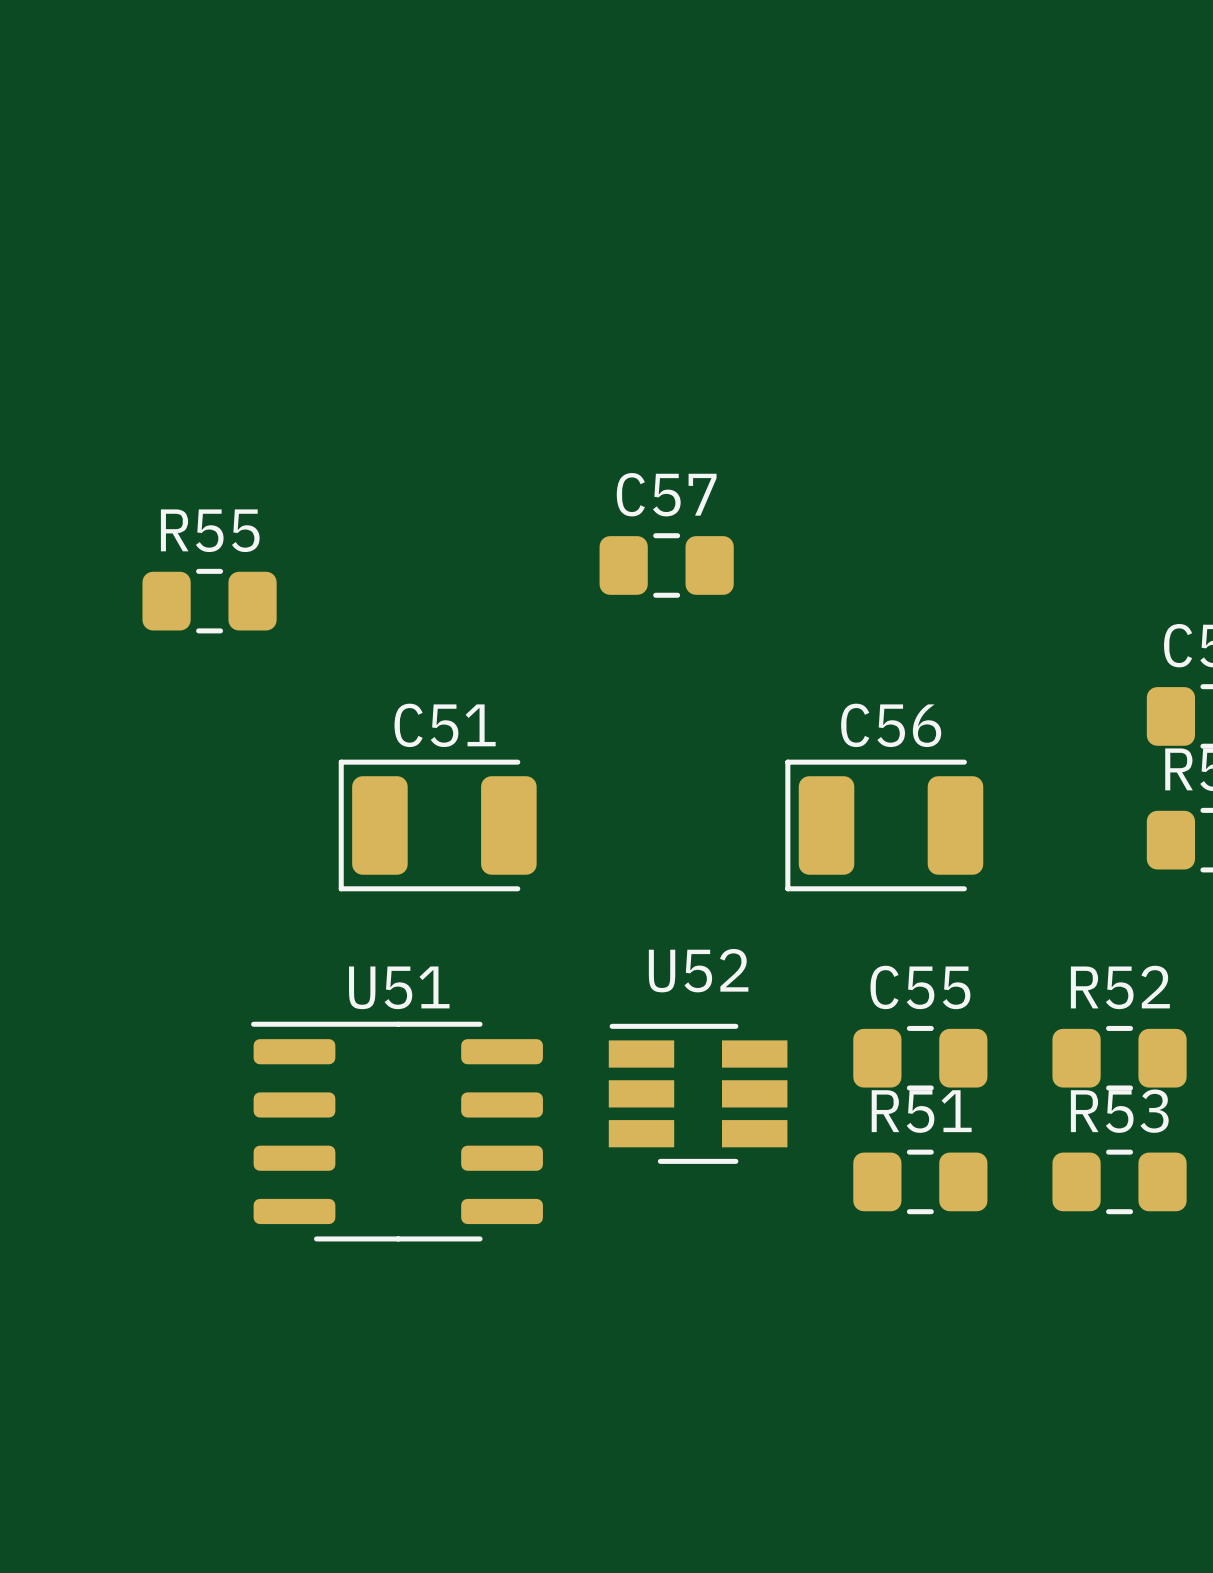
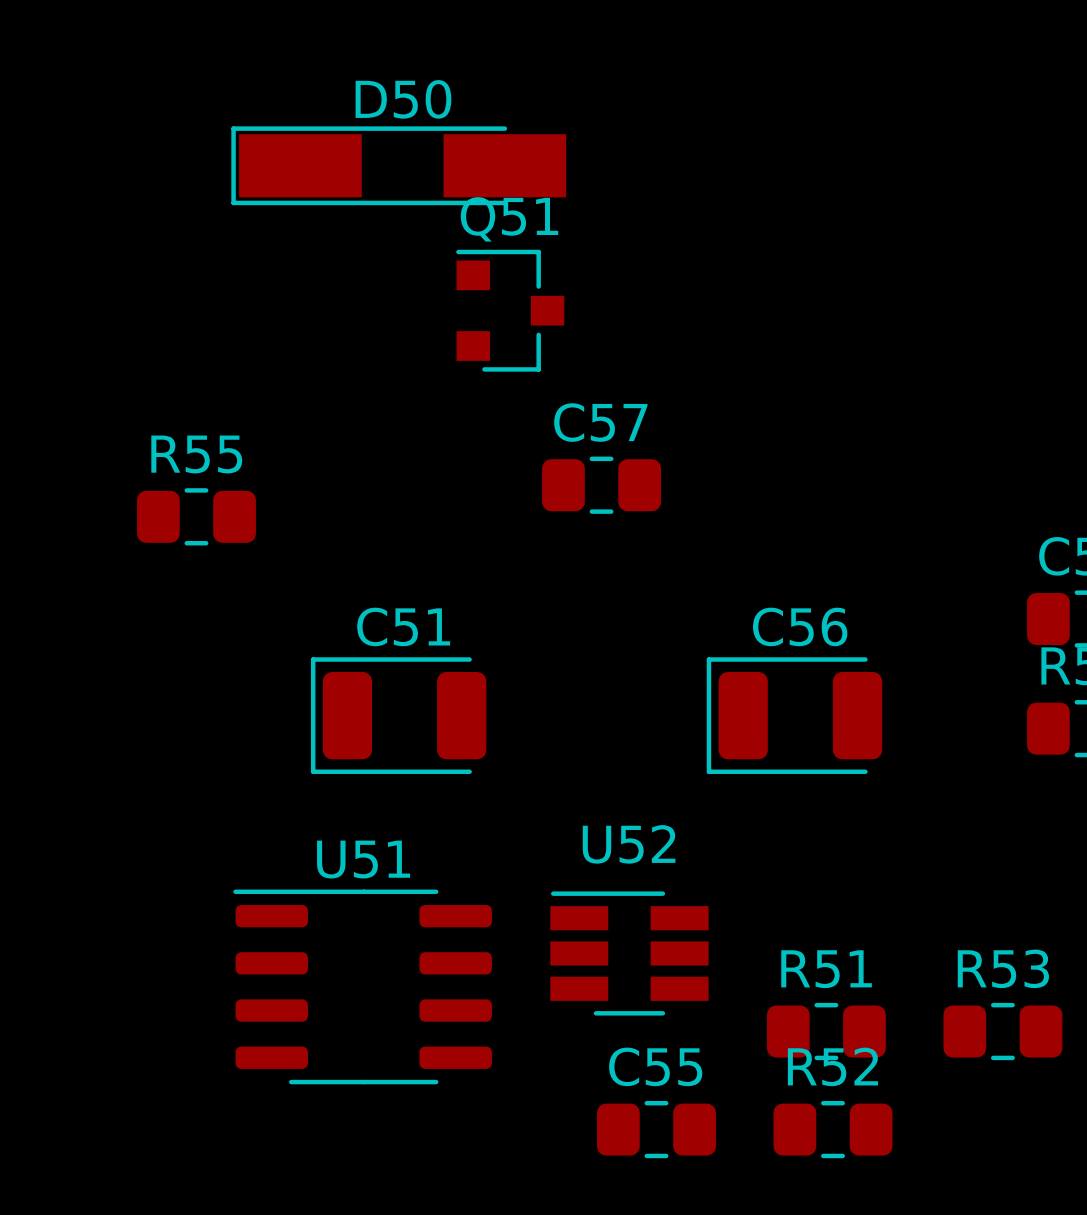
D50: none -> (398, 165)
Q51: none -> (510, 310)
C55 position: (920, 1058) -> (656, 1129)
R52 position: (1119, 1058) -> (833, 1129)

